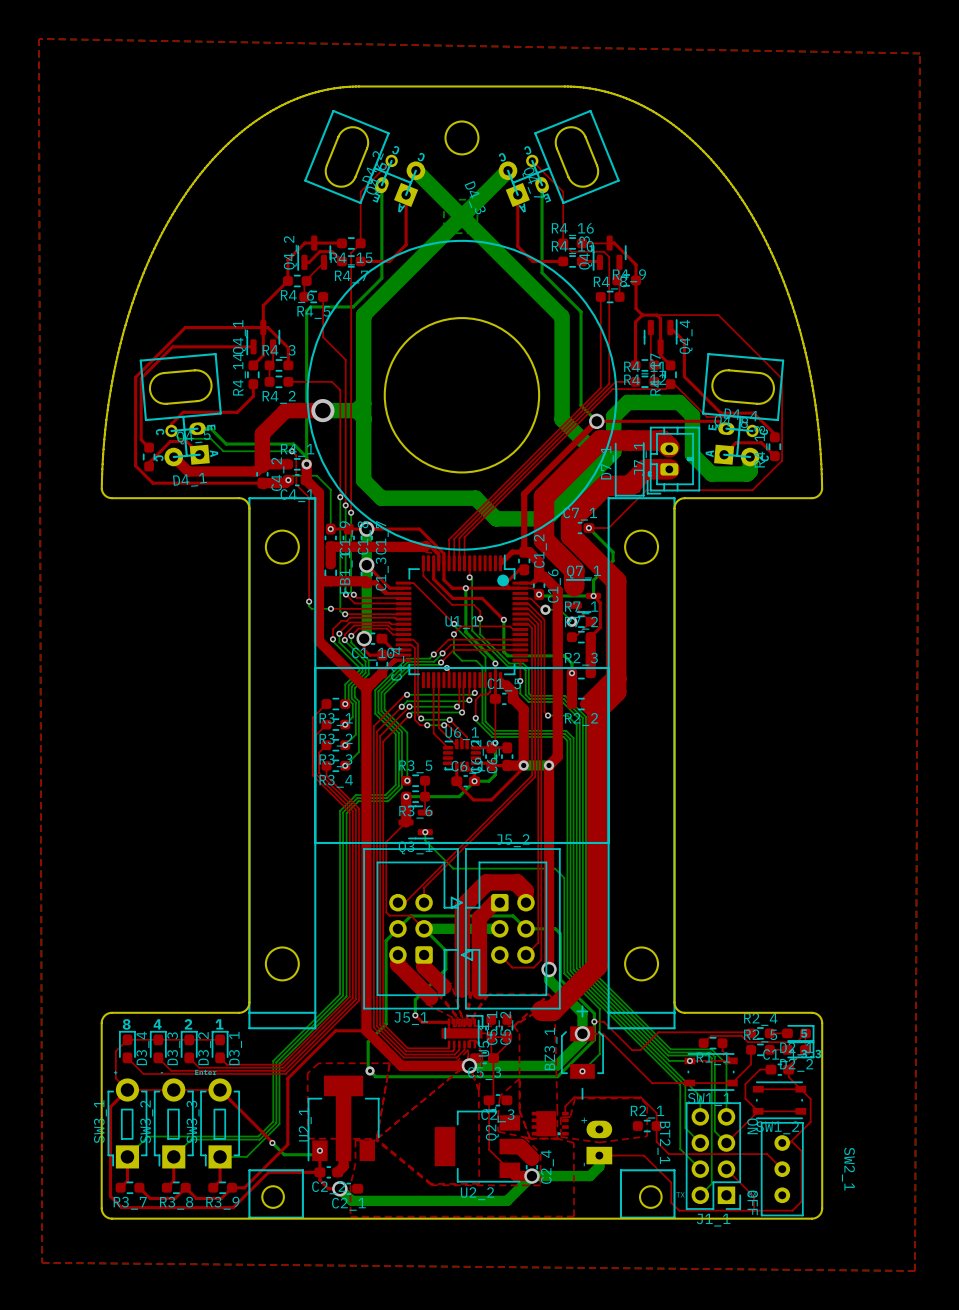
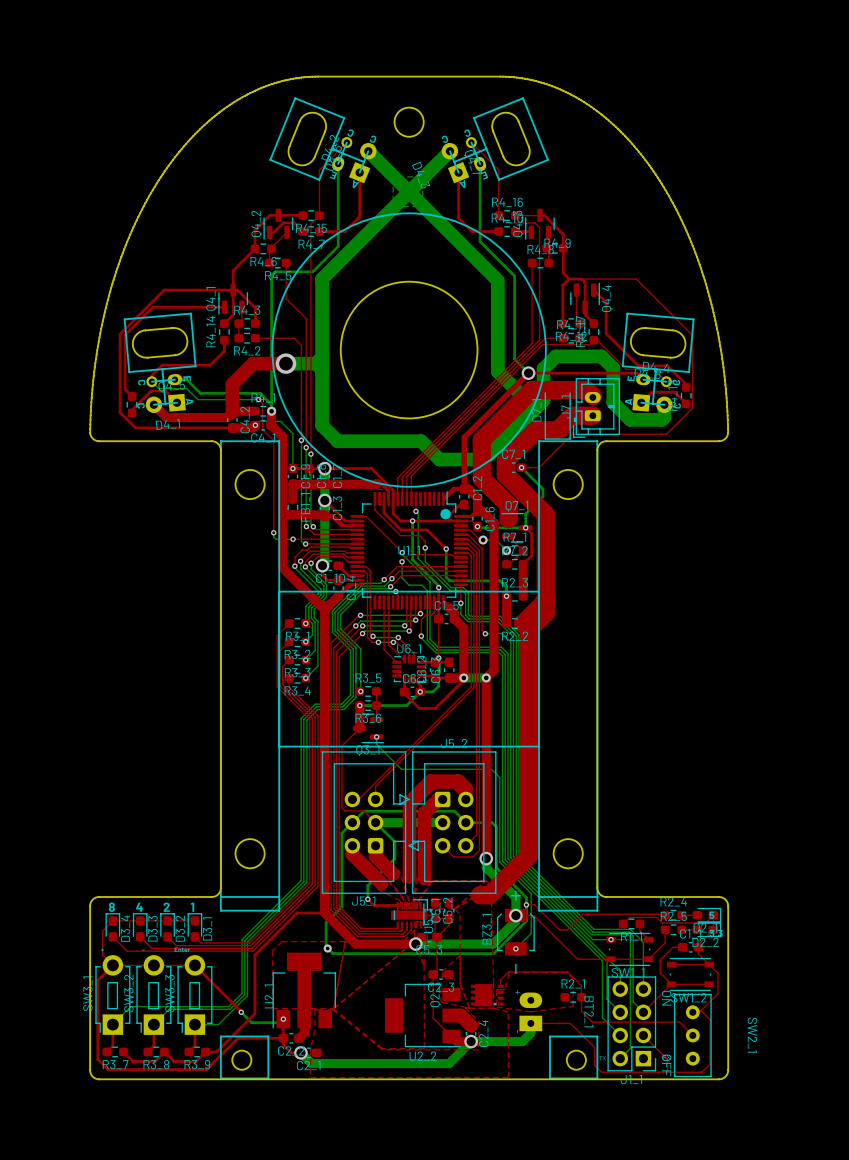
top zone outline: (38, 38) (42, 1262) (915, 1270) (919, 53) (38, 38) -> none

